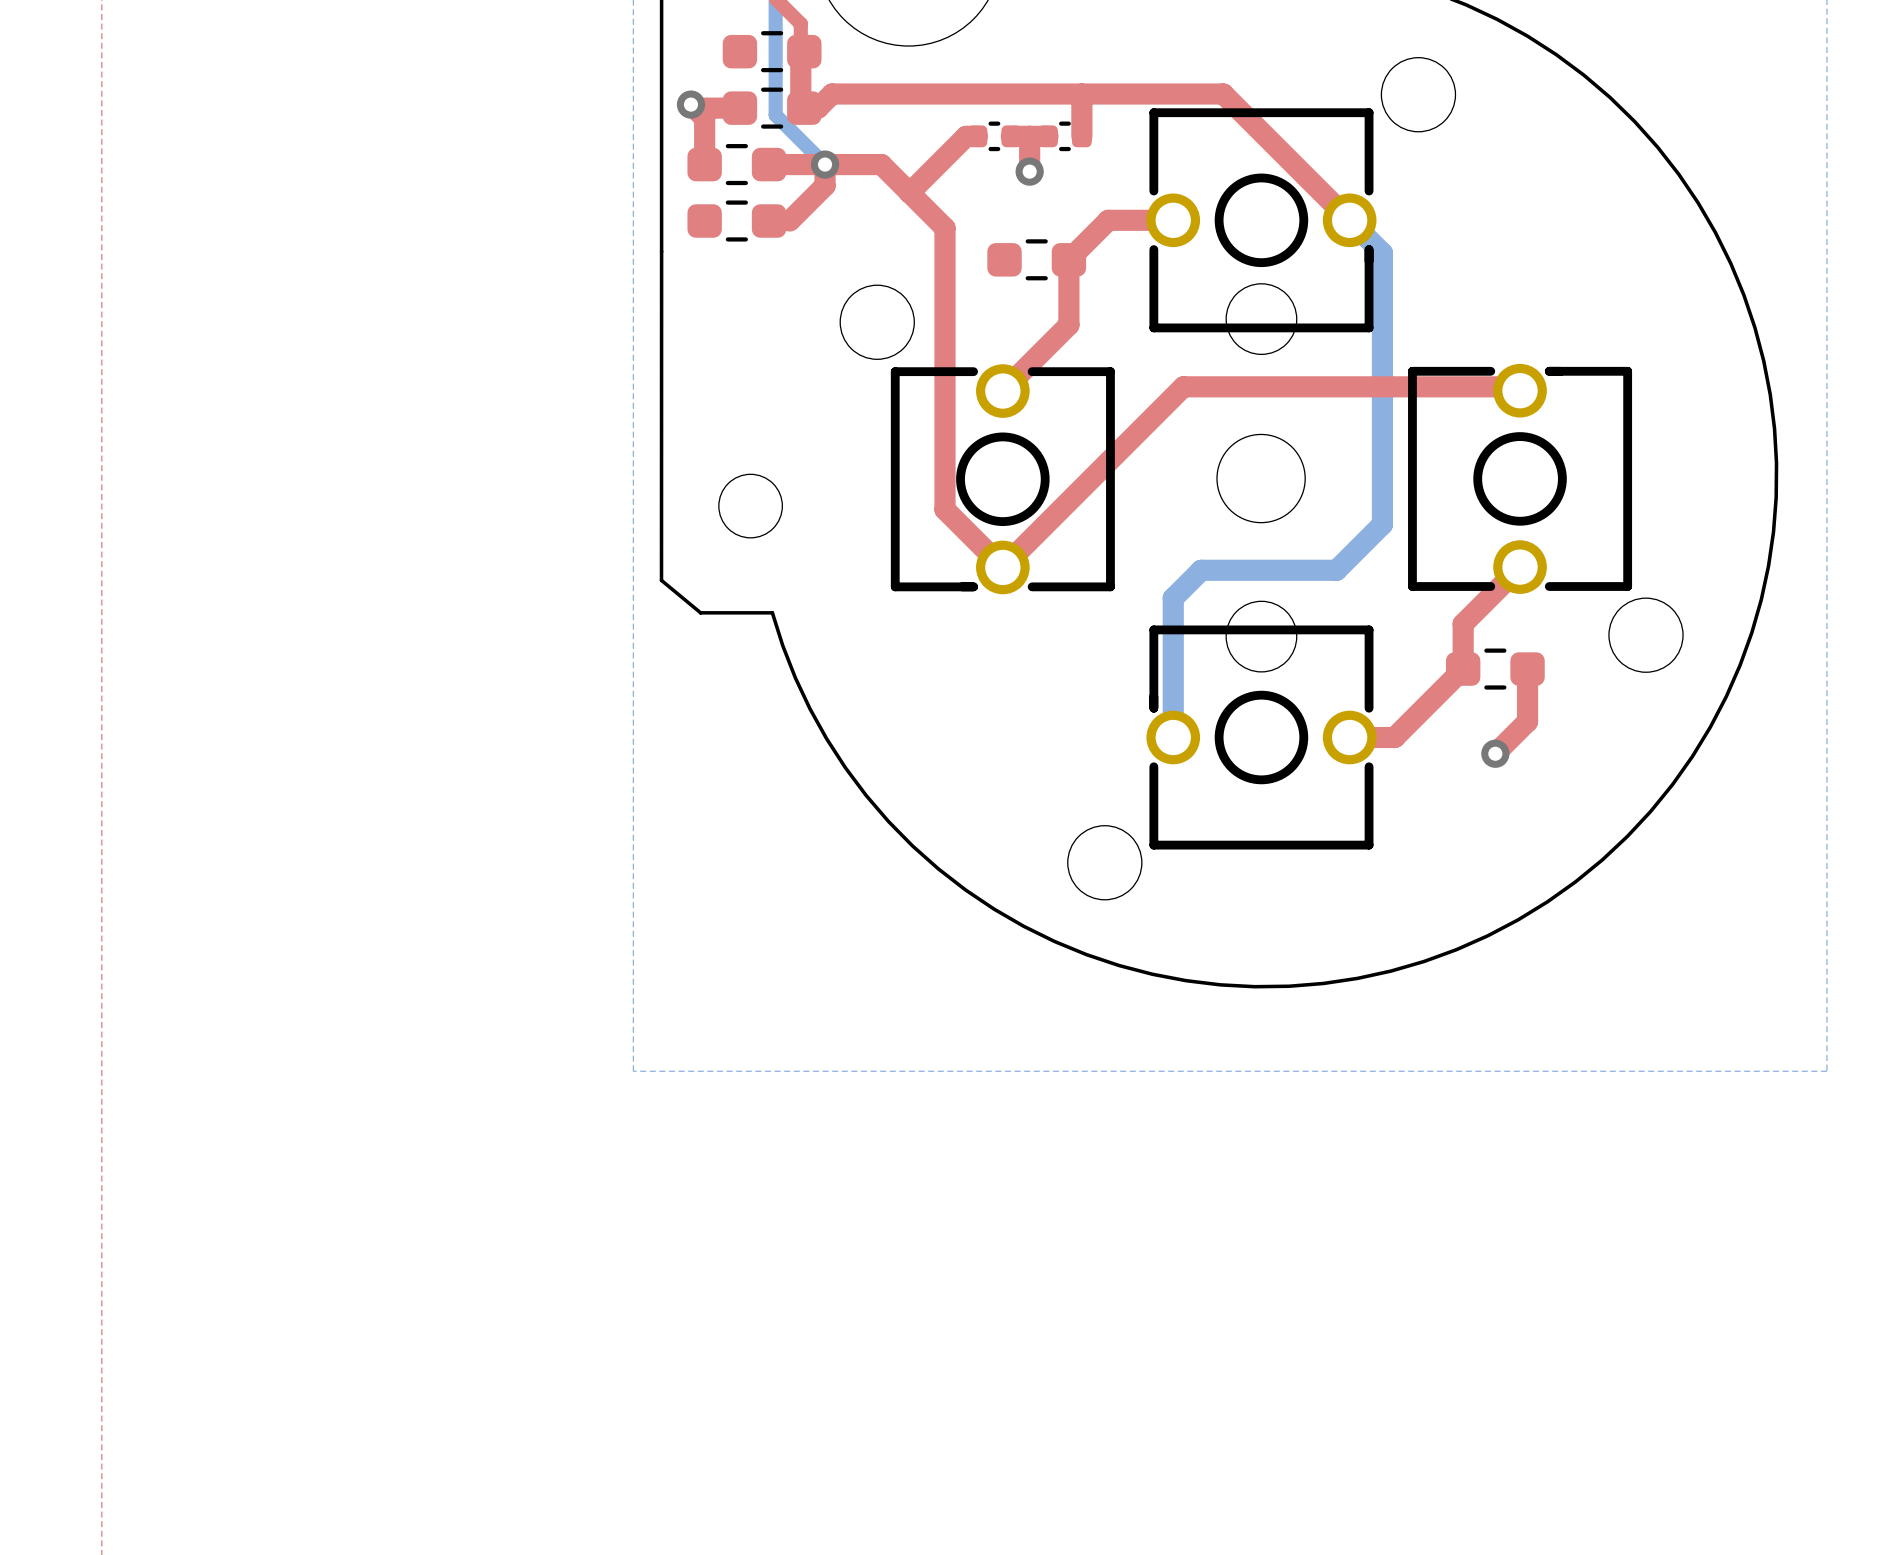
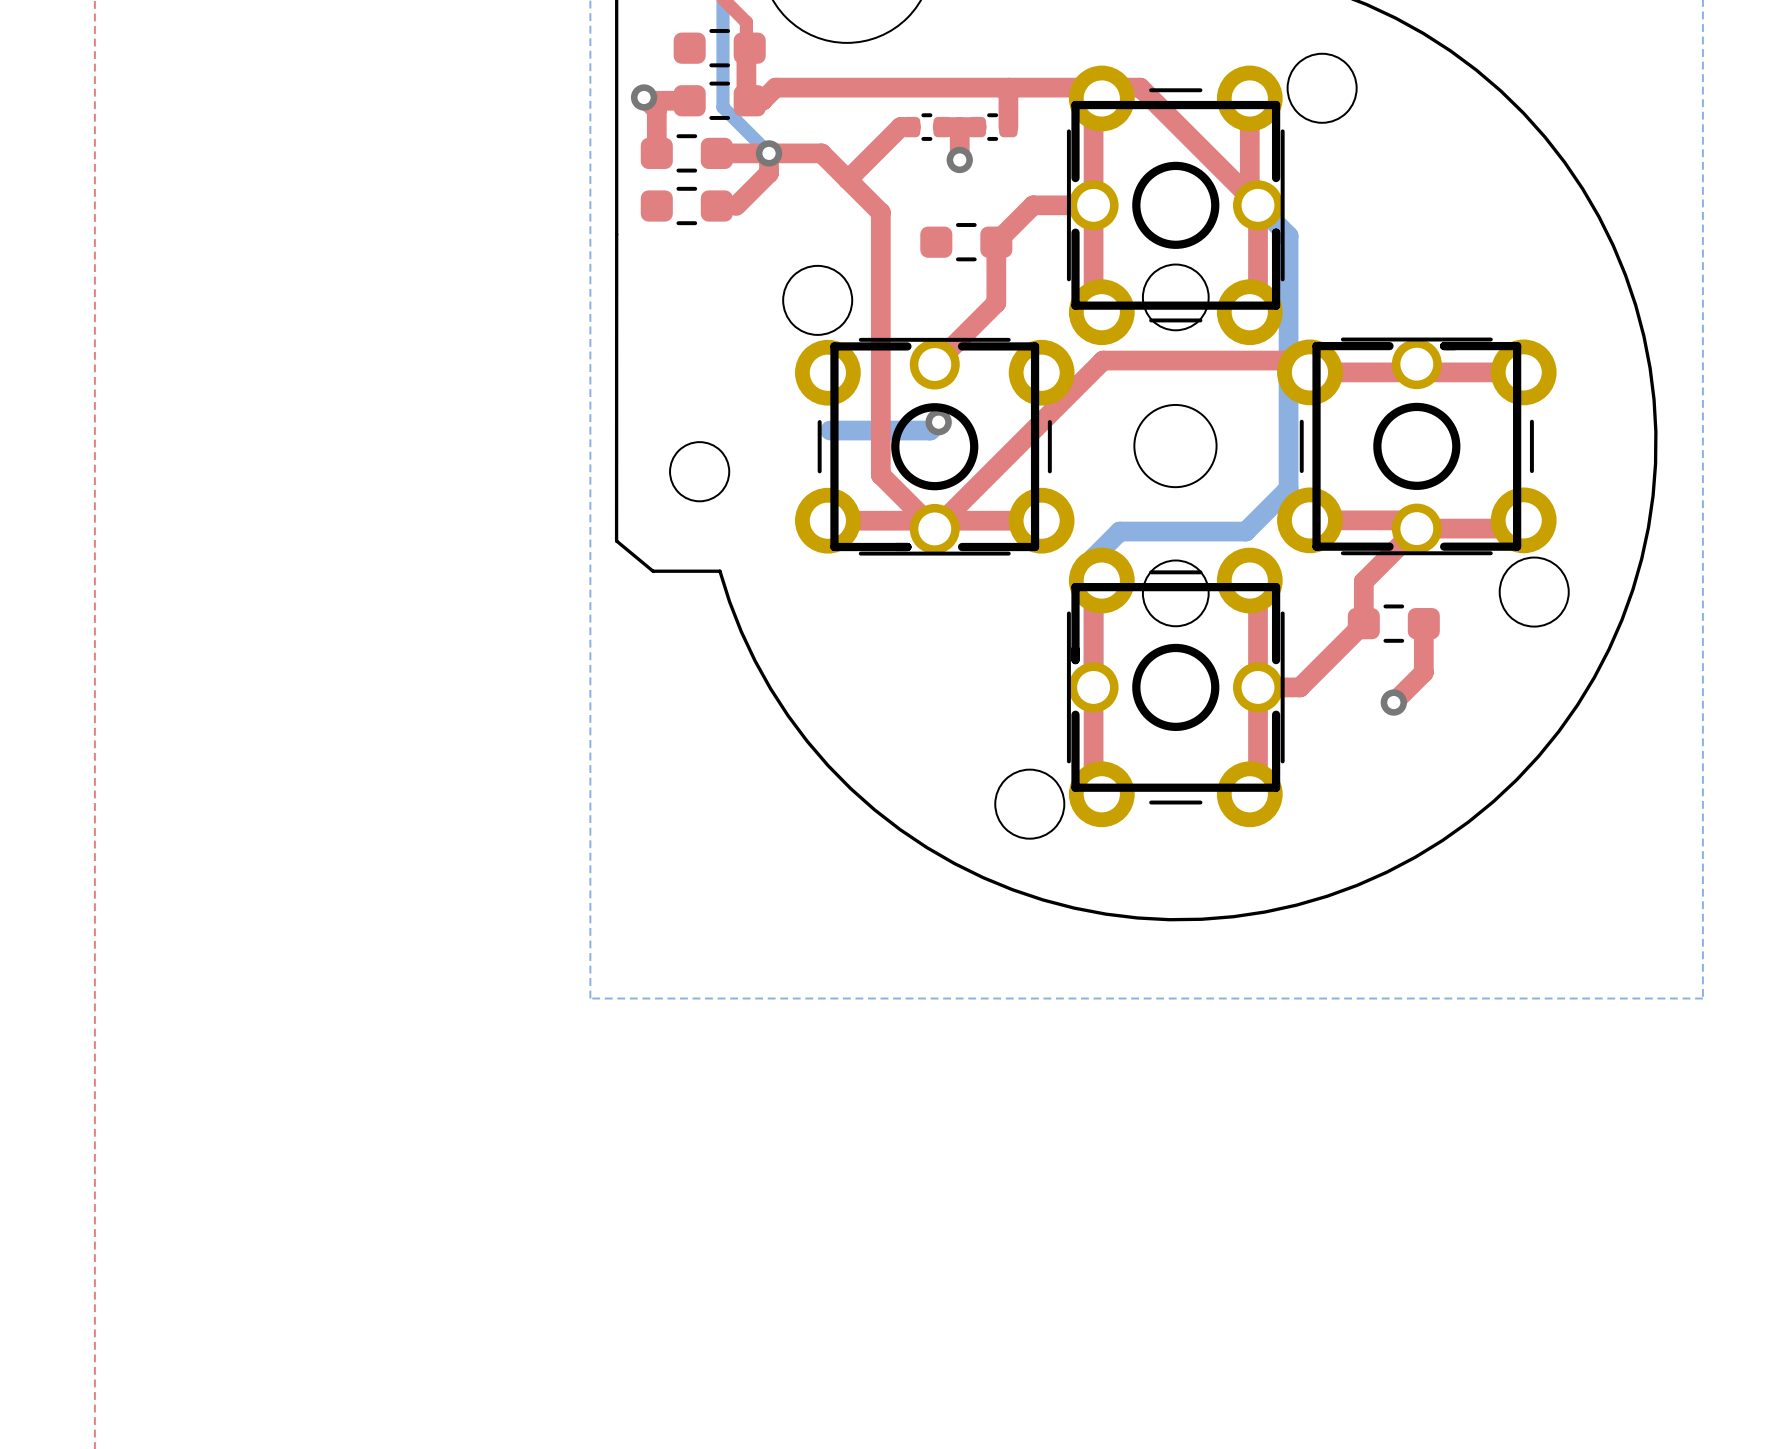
top track: none -> (1101, 98) (1093, 106) (1093, 304) (1101, 312)
top track: none -> (1249, 98) (1249, 197)
part: none -> (1175, 205)
top track: none -> (1258, 205) (1258, 304) (1249, 312)
top track: (1392, 386) (1516, 386) -> (1298, 360) (1309, 372) (1408, 372) (1416, 364) (1425, 372) (1523, 372)
bottom track: none -> (938, 422) (930, 430) (830, 430)
via: none -> (938, 422)
part: none -> (1416, 446)
part: none -> (934, 446)
top track: none -> (827, 520) (926, 520)
top track: none -> (942, 520) (1041, 520)
top track: none -> (1309, 520) (1408, 520) (1416, 528) (1515, 528) (1523, 520)
top track: none -> (1101, 580) (1093, 588) (1093, 786) (1101, 794)
top track: none -> (1249, 580) (1258, 588) (1258, 786) (1249, 794)
part: none -> (1175, 687)

